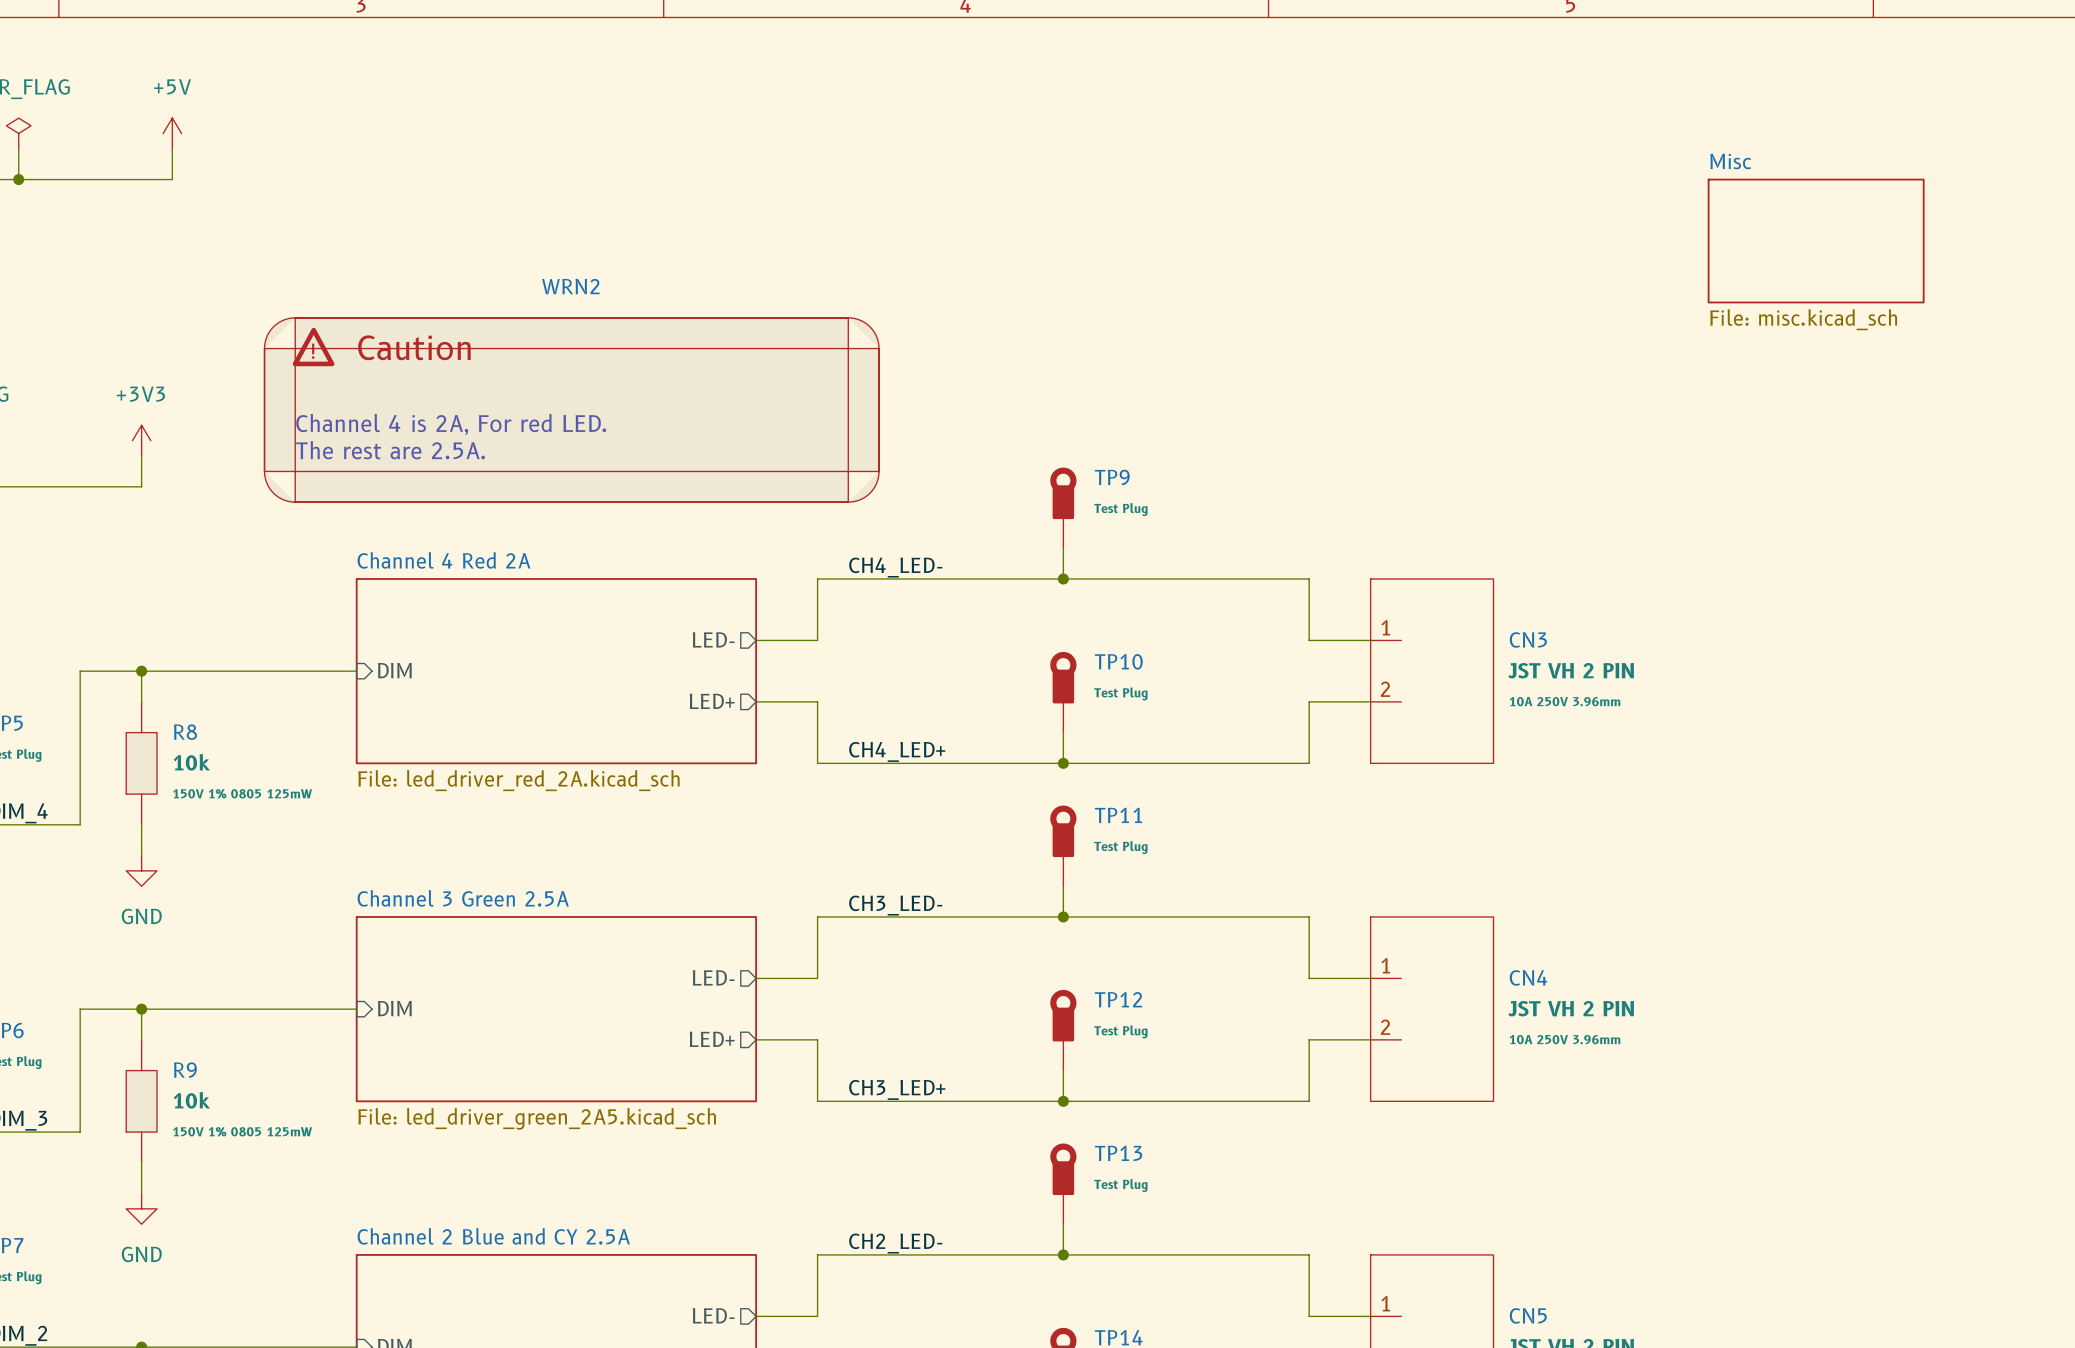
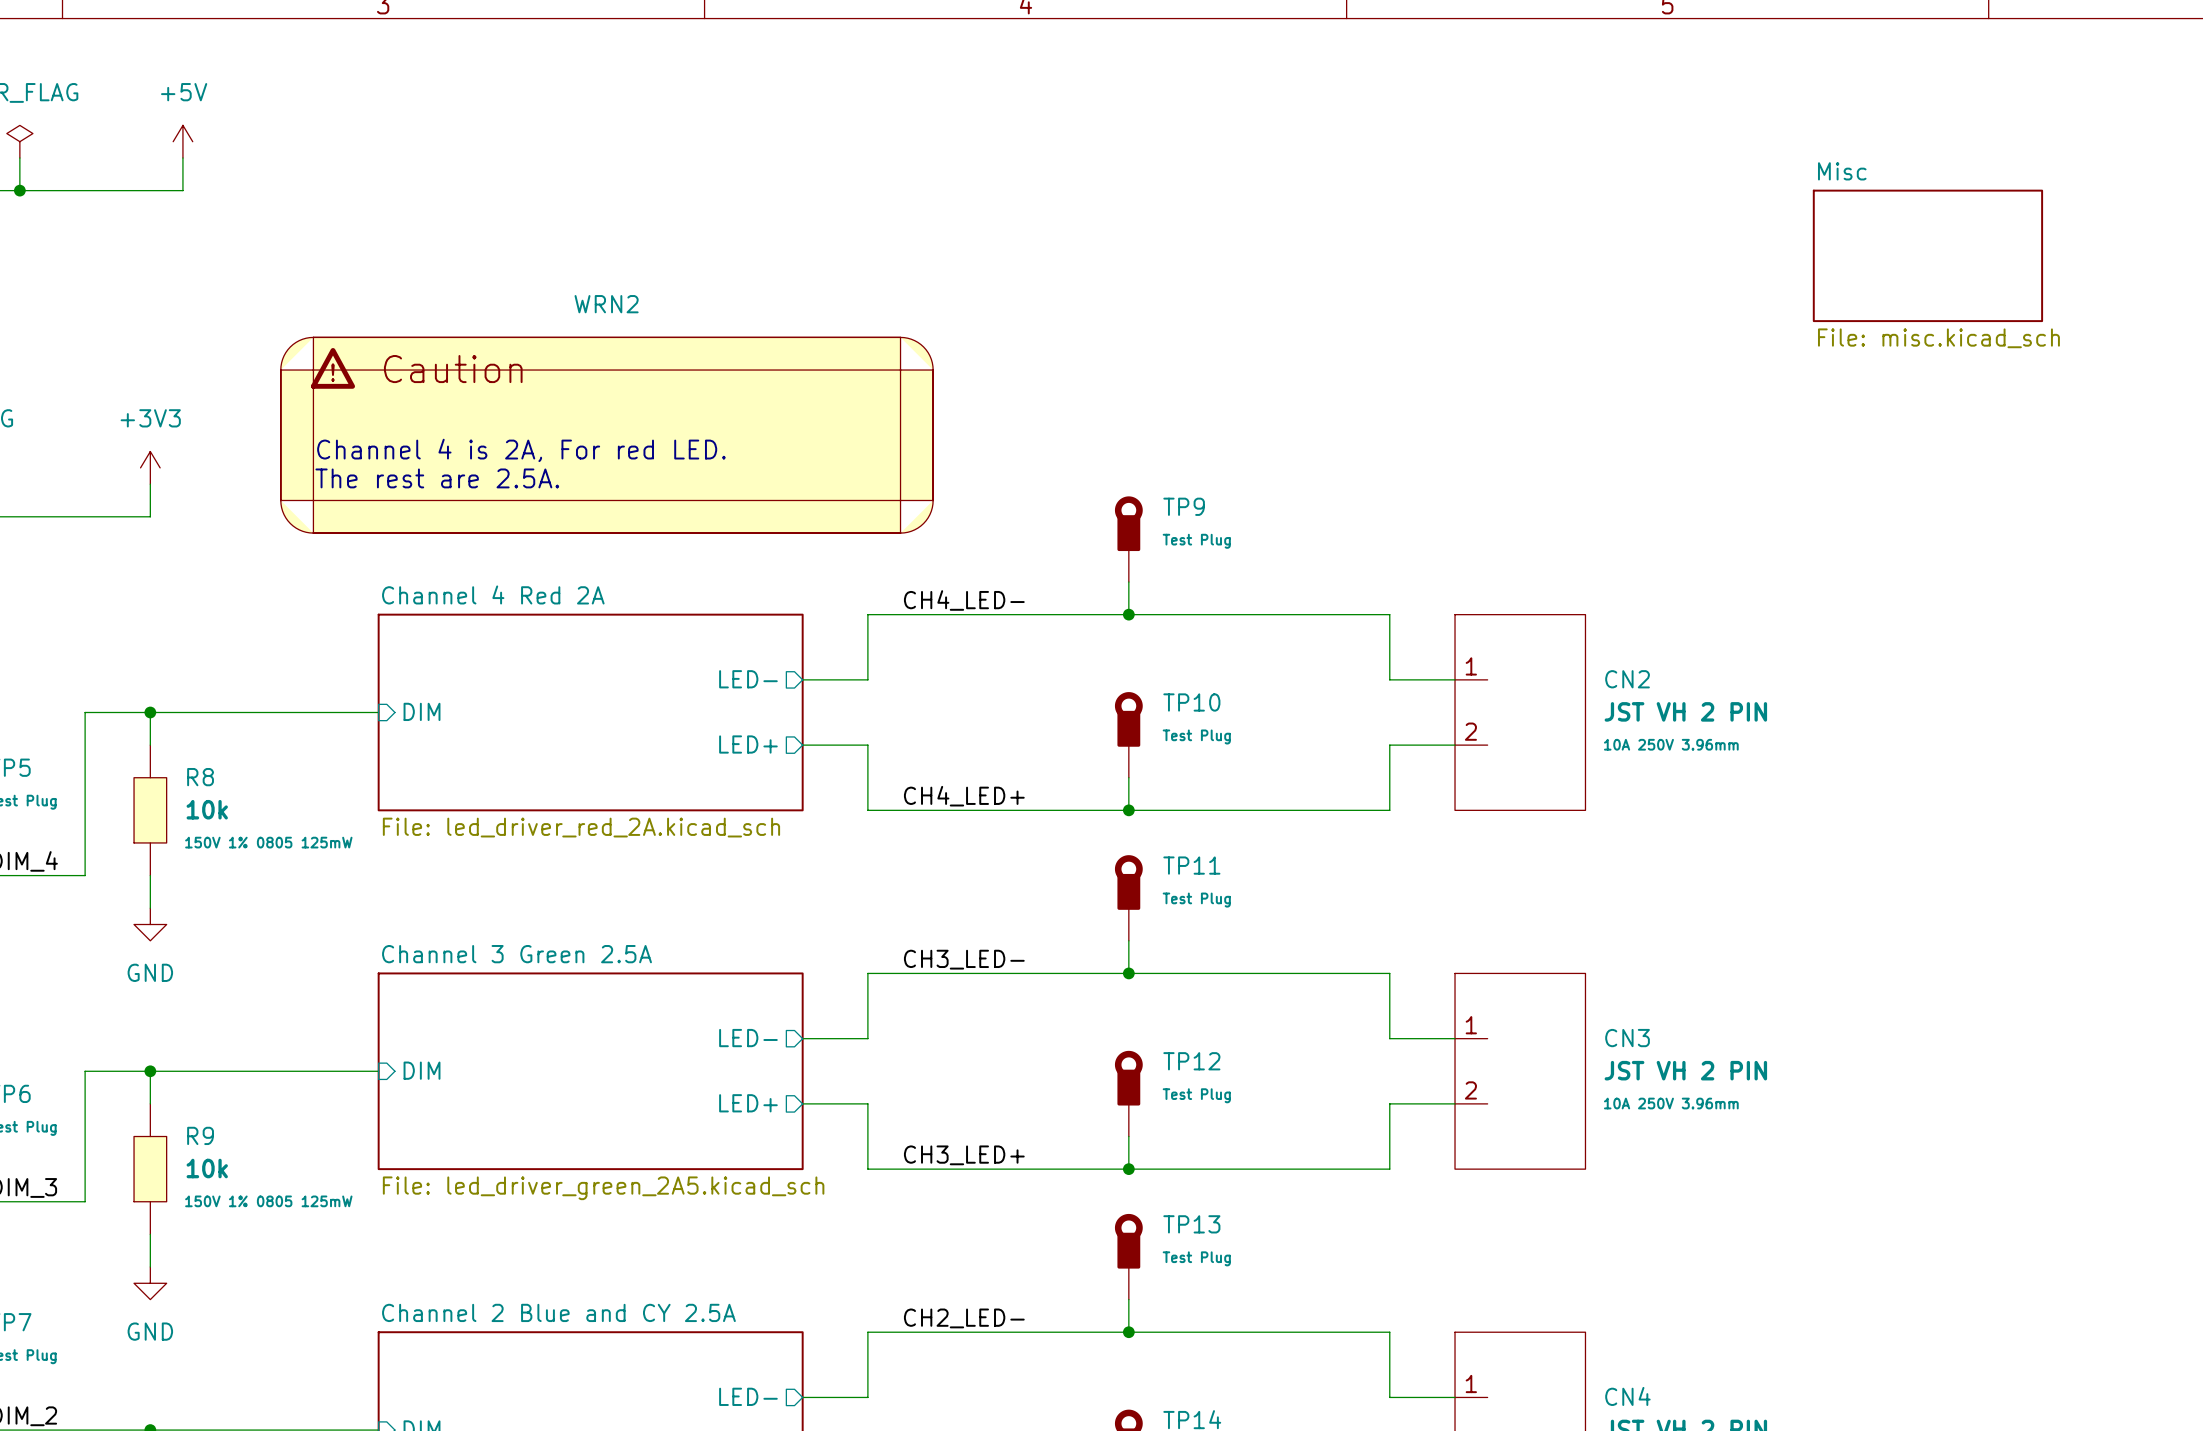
CN3 name: CN3 (1528, 639) -> CN2 (1627, 679)
CN4 name: CN4 (1528, 977) -> CN3 (1627, 1038)
CN5 name: CN5 (1528, 1315) -> CN4 (1627, 1396)

